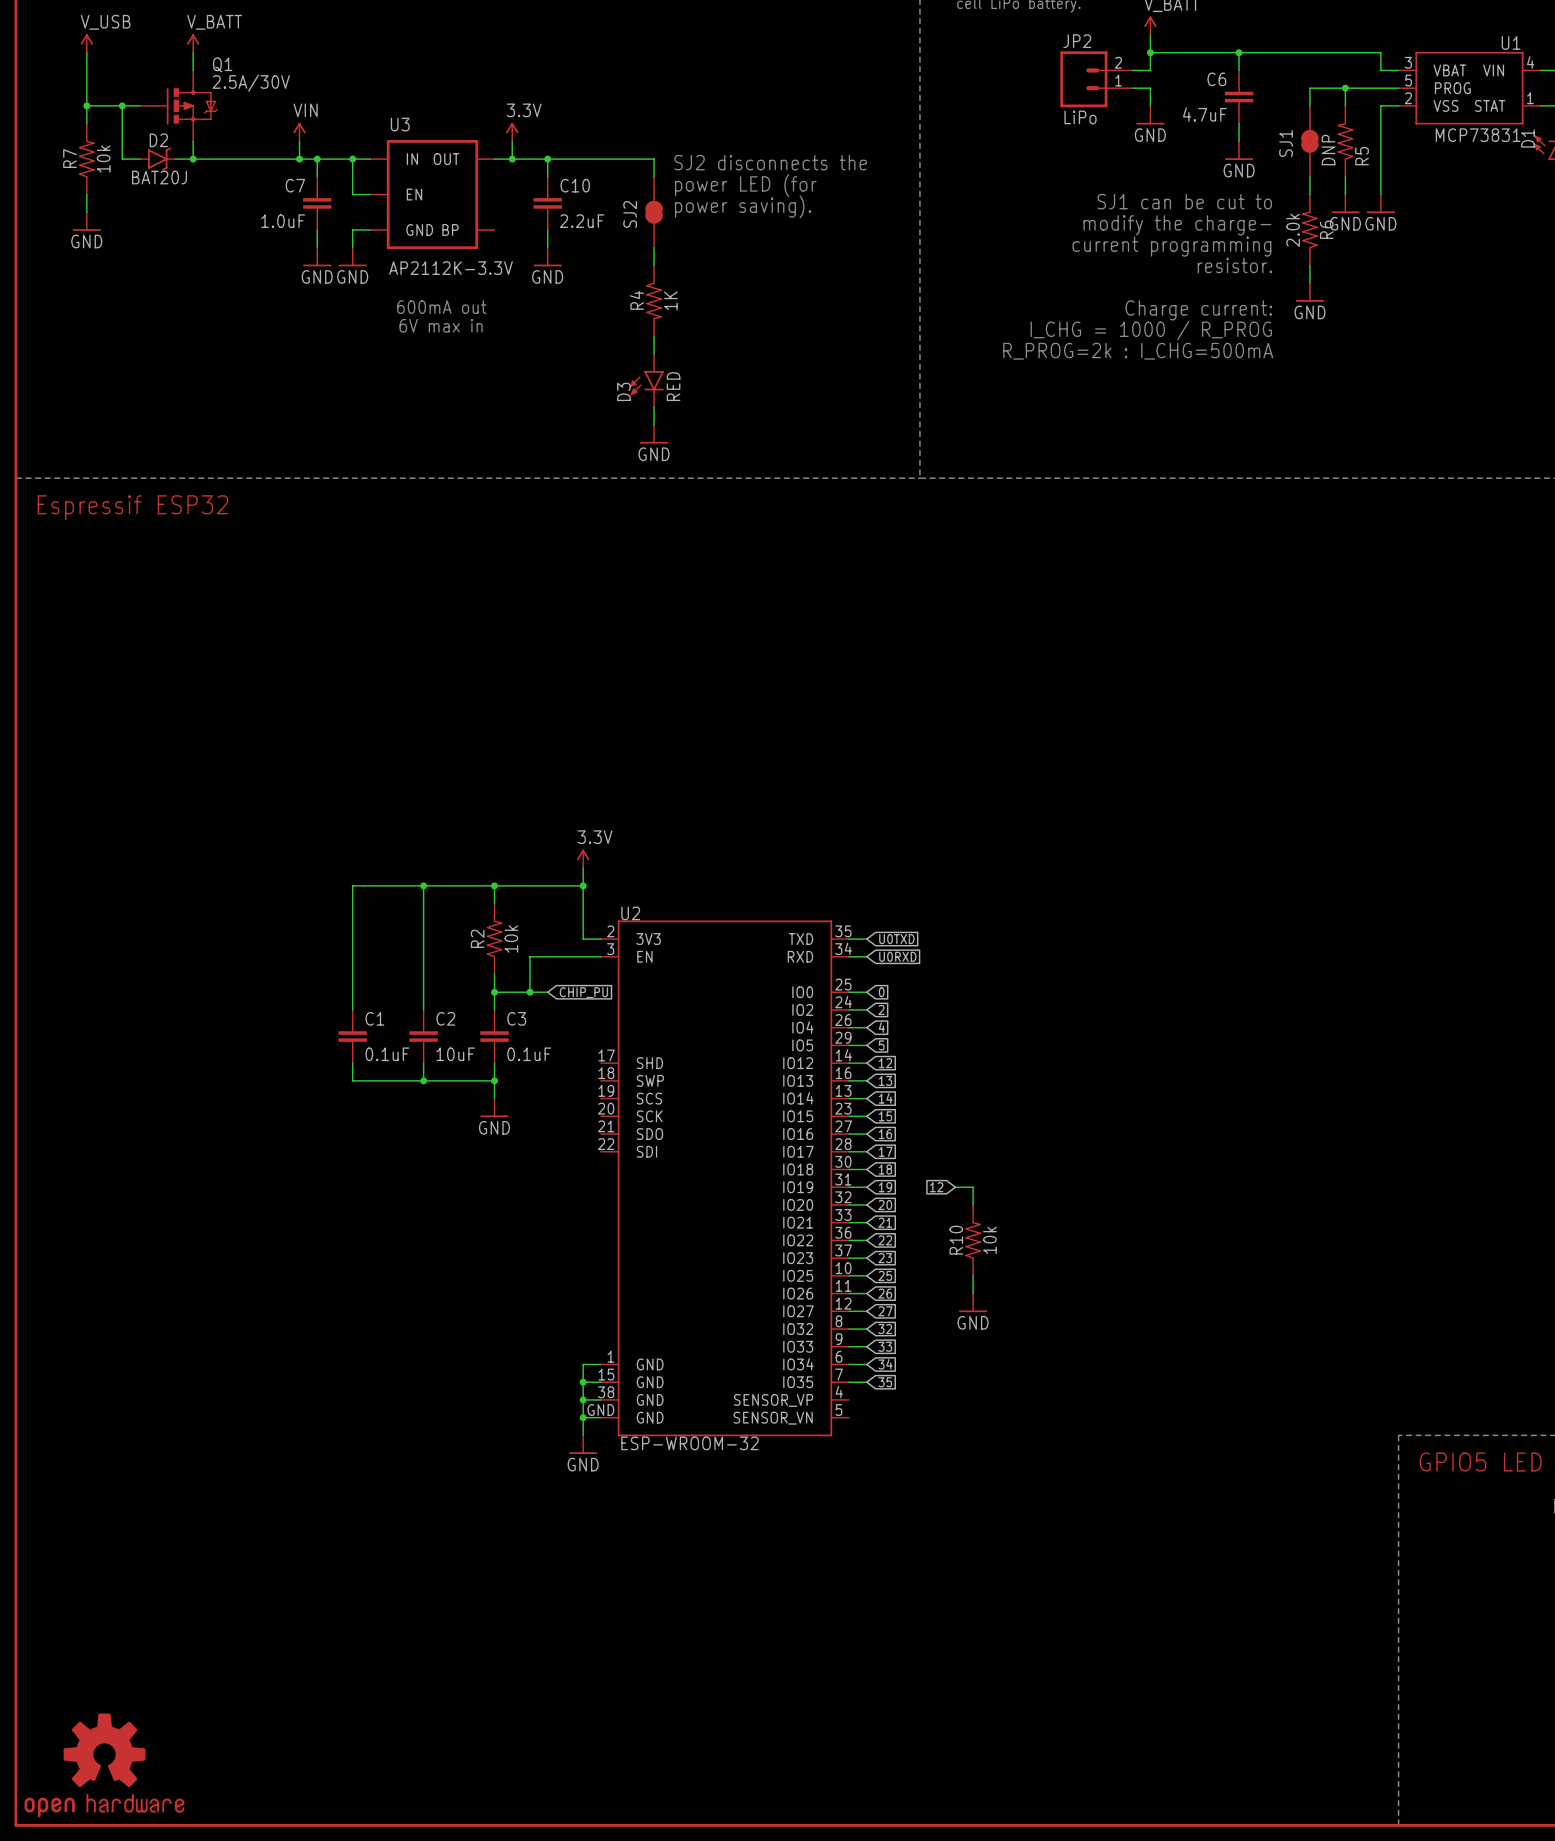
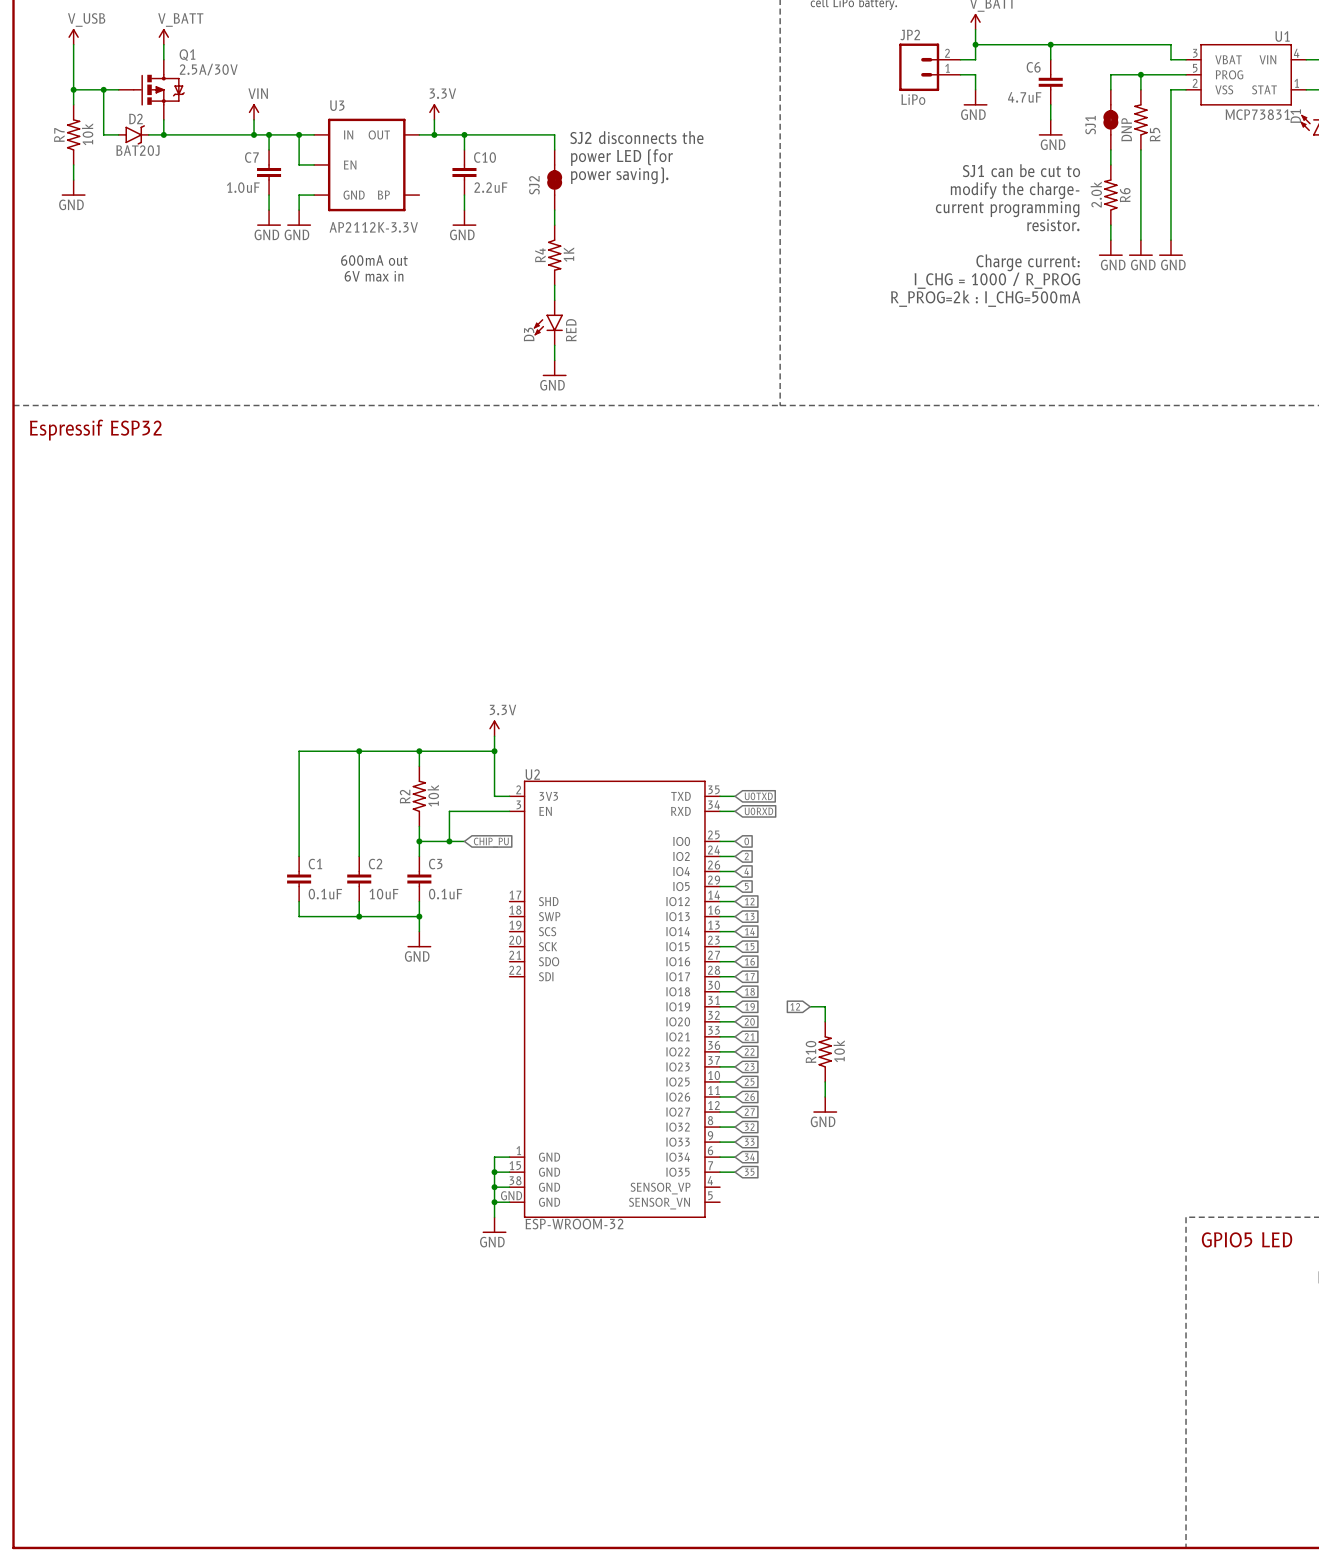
wire: none -> (1140, 164) (1140, 240)
wire: none -> (1170, 164) (1170, 240)
power symbol: GND (1345, 203) -> none
power symbol: GND (1380, 203) -> none
power symbol: none -> GND (1140, 248)
power symbol: none -> GND (1170, 248)
part: (104, 1765) -> none

